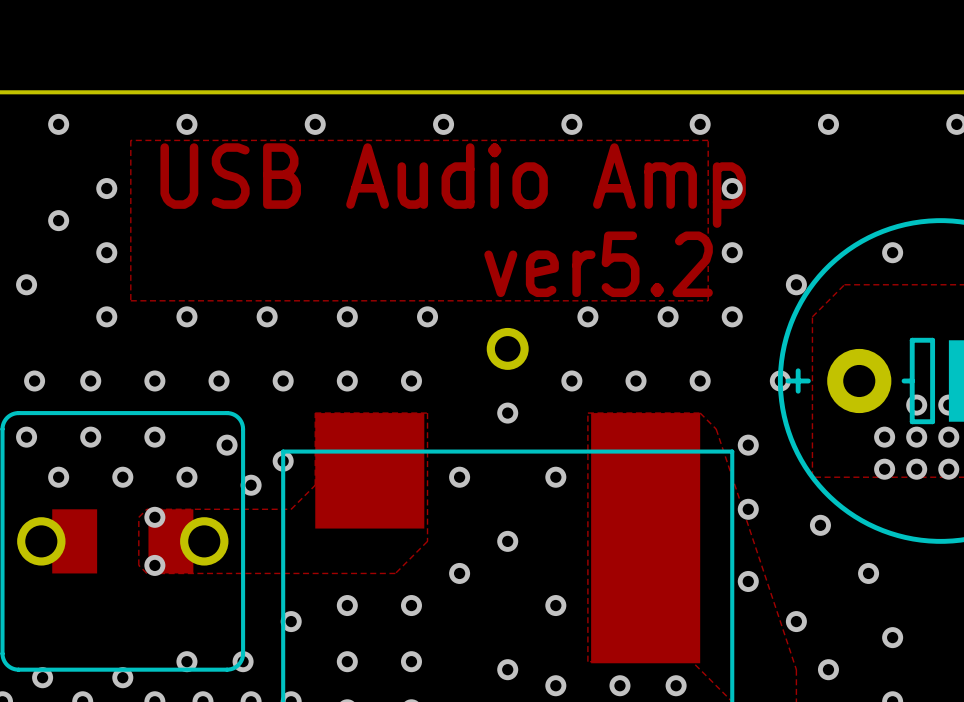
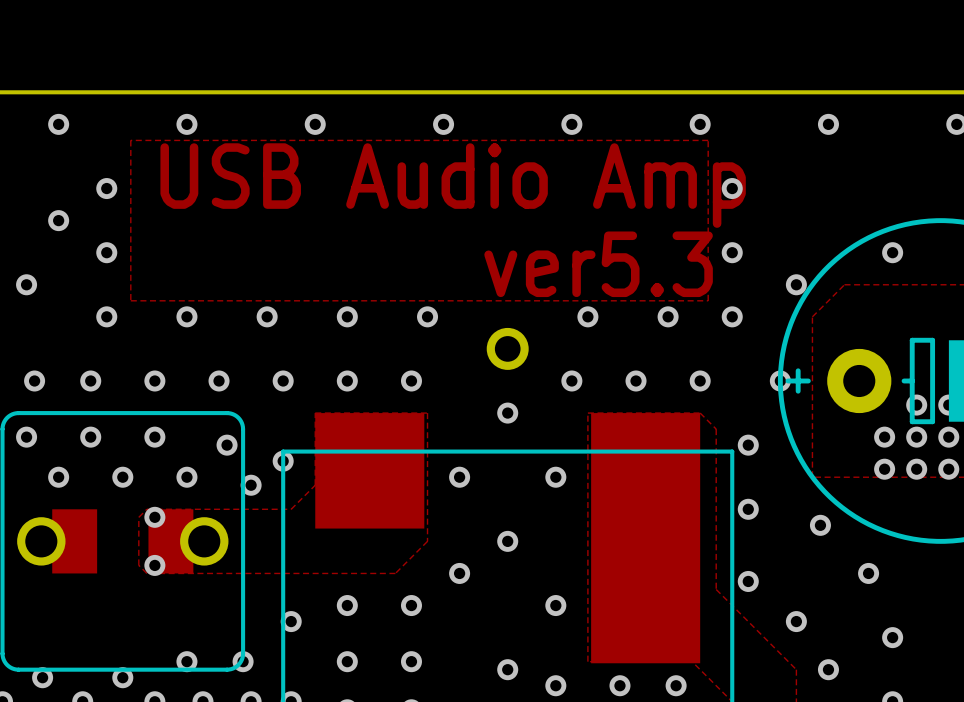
text: ver5.2 (598, 264) -> ver5.3 (598, 264)
zone outline: (716, 429) (796, 669) -> (716, 429) (716, 589) (796, 669)

